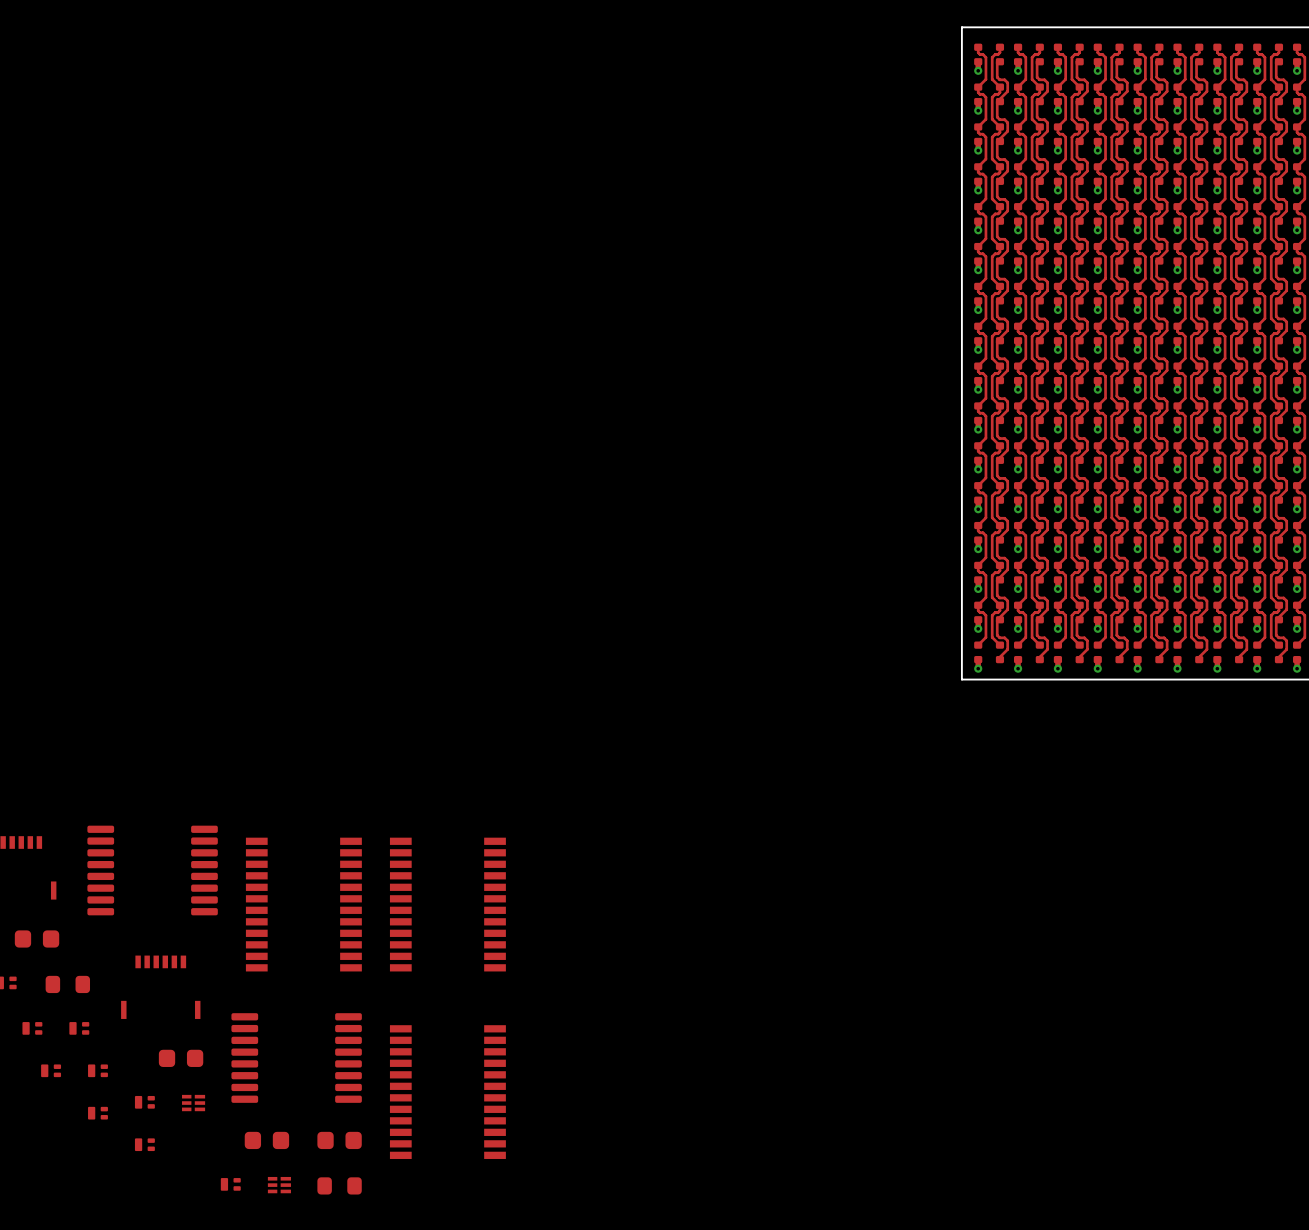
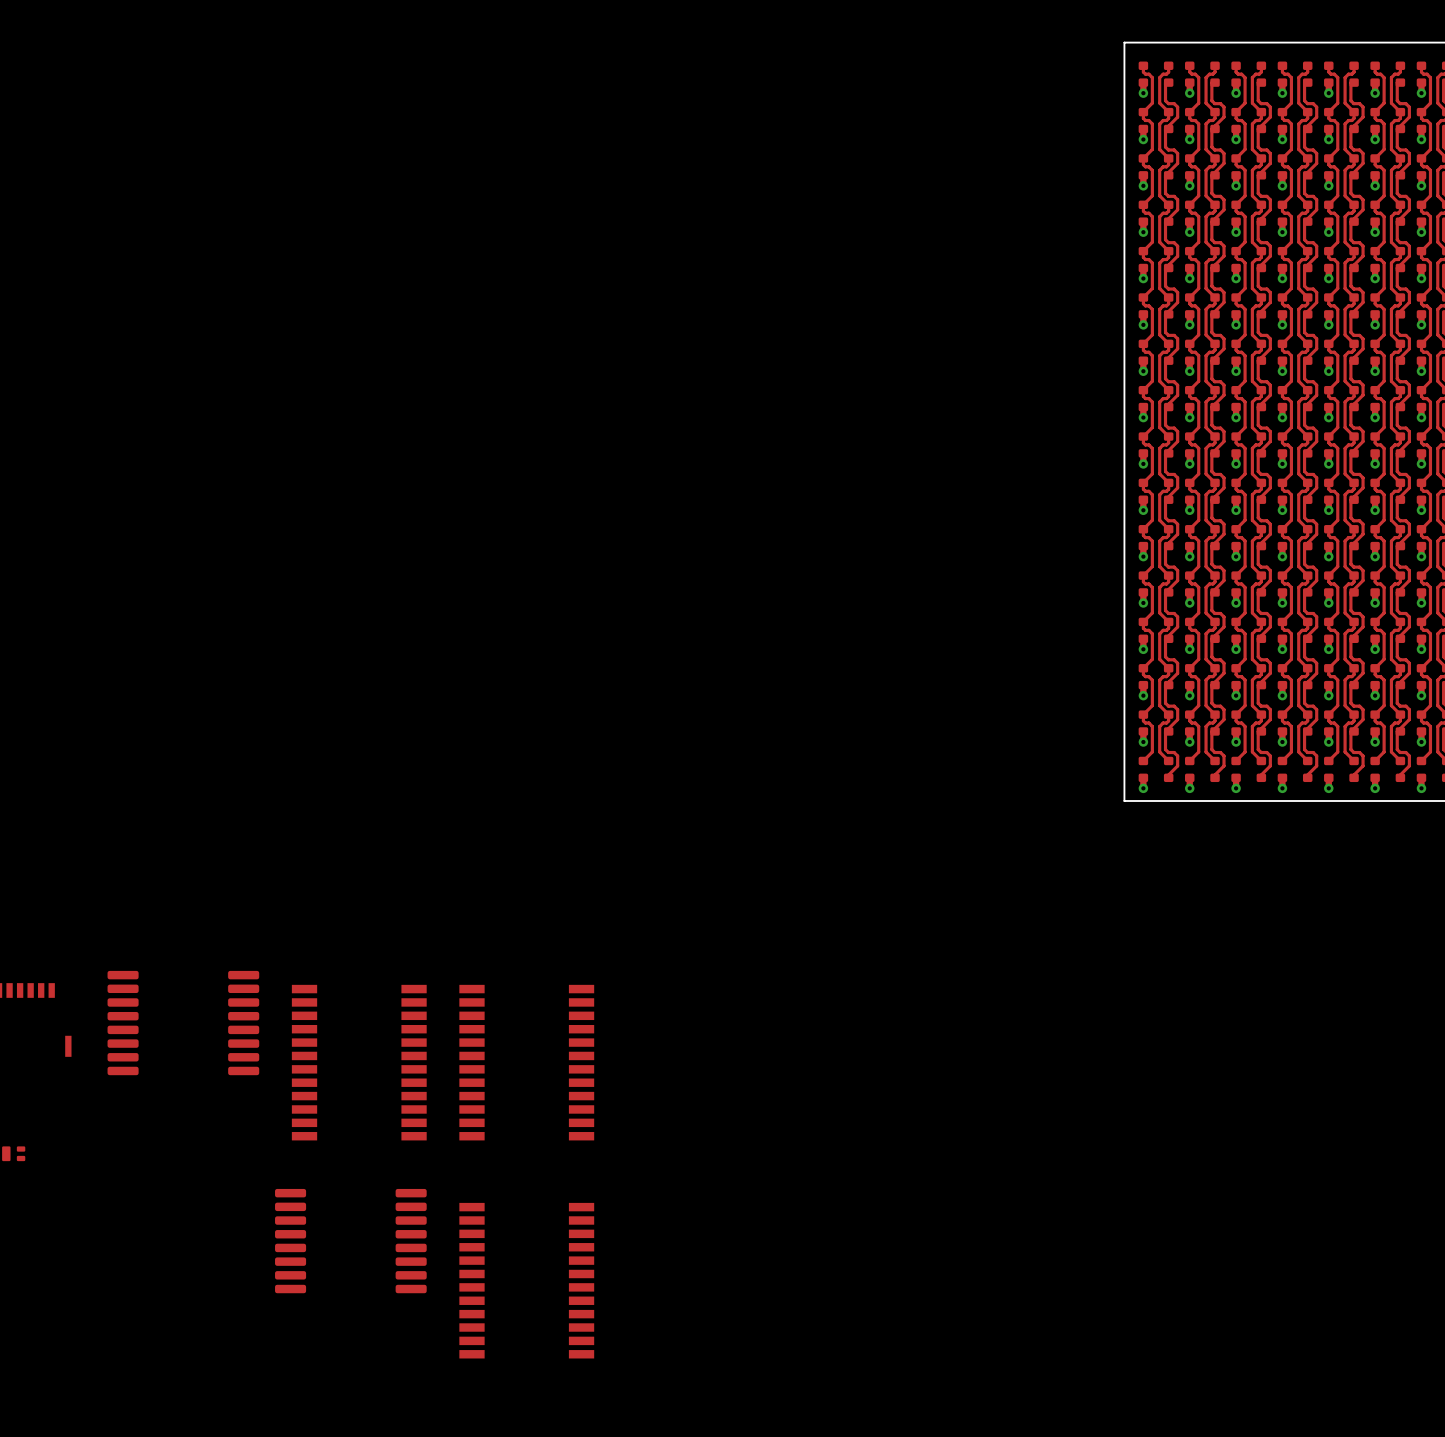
part: (37, 938) -> none
part: (67, 984) -> none
part: (160, 987) -> none
part: (32, 1028) -> none
part: (79, 1028) -> none
part: (181, 1058) -> none
part: (51, 1070) -> none
part: (97, 1070) -> none
part: (144, 1102) -> none
part: (193, 1103) -> none
part: (97, 1113) -> none
part: (266, 1140) -> none
part: (339, 1140) -> none
part: (144, 1144) -> none
part: (230, 1184) -> none
part: (279, 1185) -> none
part: (339, 1185) -> none

